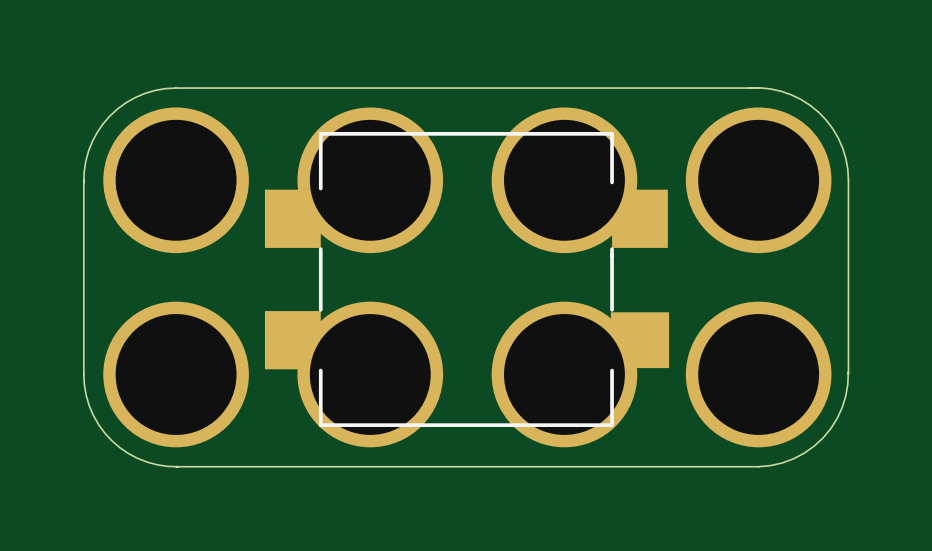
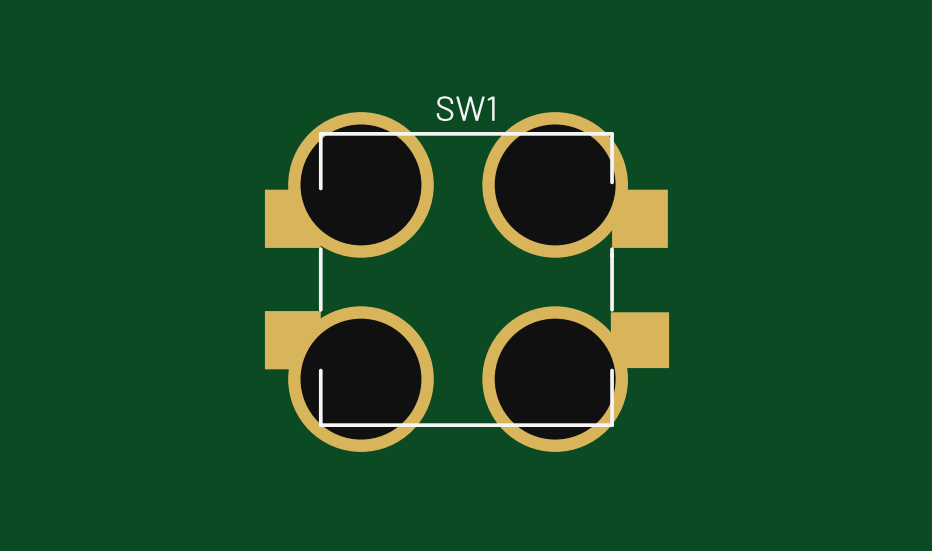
part footprint: [83, 87, 849, 468] -> [288, 112, 628, 452]
SW1 name: none -> SW1 (465, 108)

